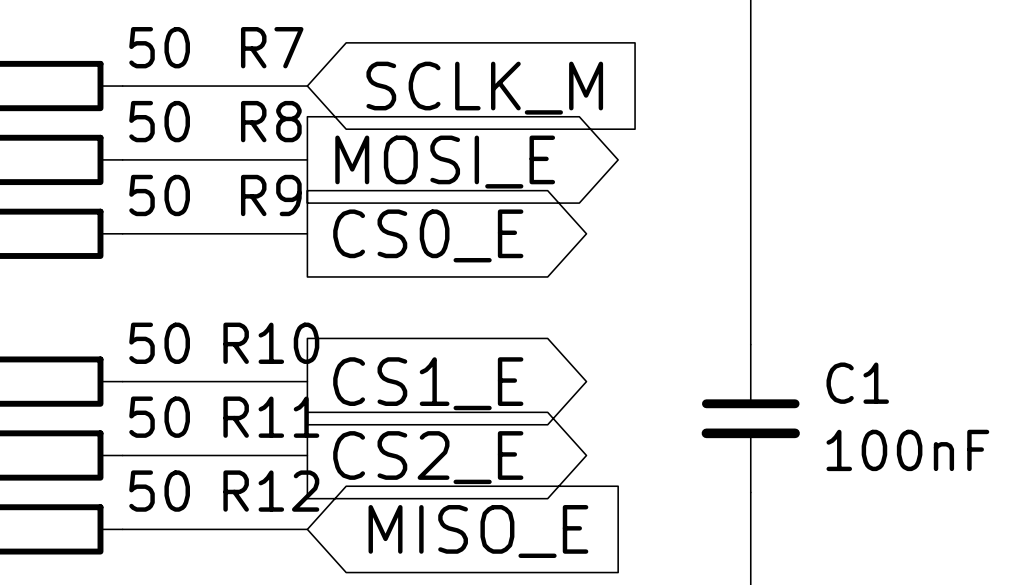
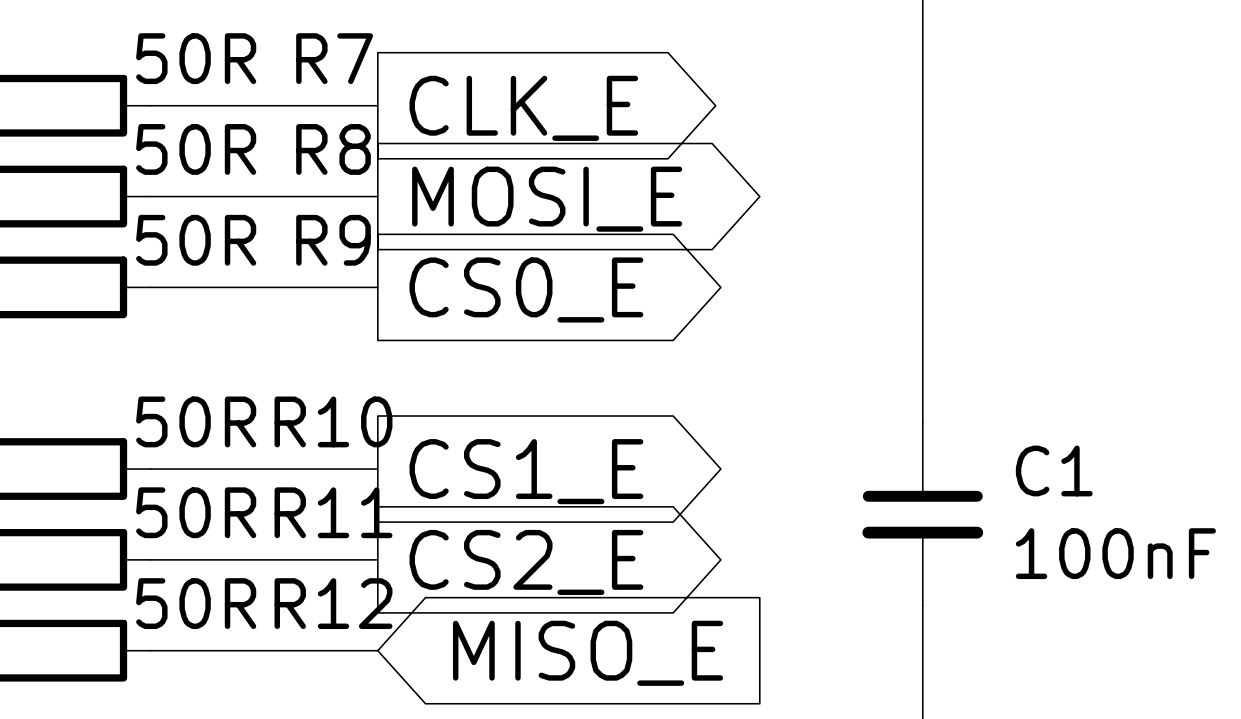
R7 value: 50 (159, 47) -> 50R (196, 58)
global label shape: input (484, 88) -> output (523, 108)
global label: SCLK_M (484, 88) -> CLK_E (523, 108)
R8 value: 50 (159, 121) -> 50R (196, 149)
R9 value: 50 (159, 195) -> 50R (196, 240)
R10 value: 50 (159, 343) -> 50R (196, 421)
R11 value: 50 (159, 417) -> 50R (196, 512)
R12 value: 50 (159, 491) -> 50R (196, 603)

